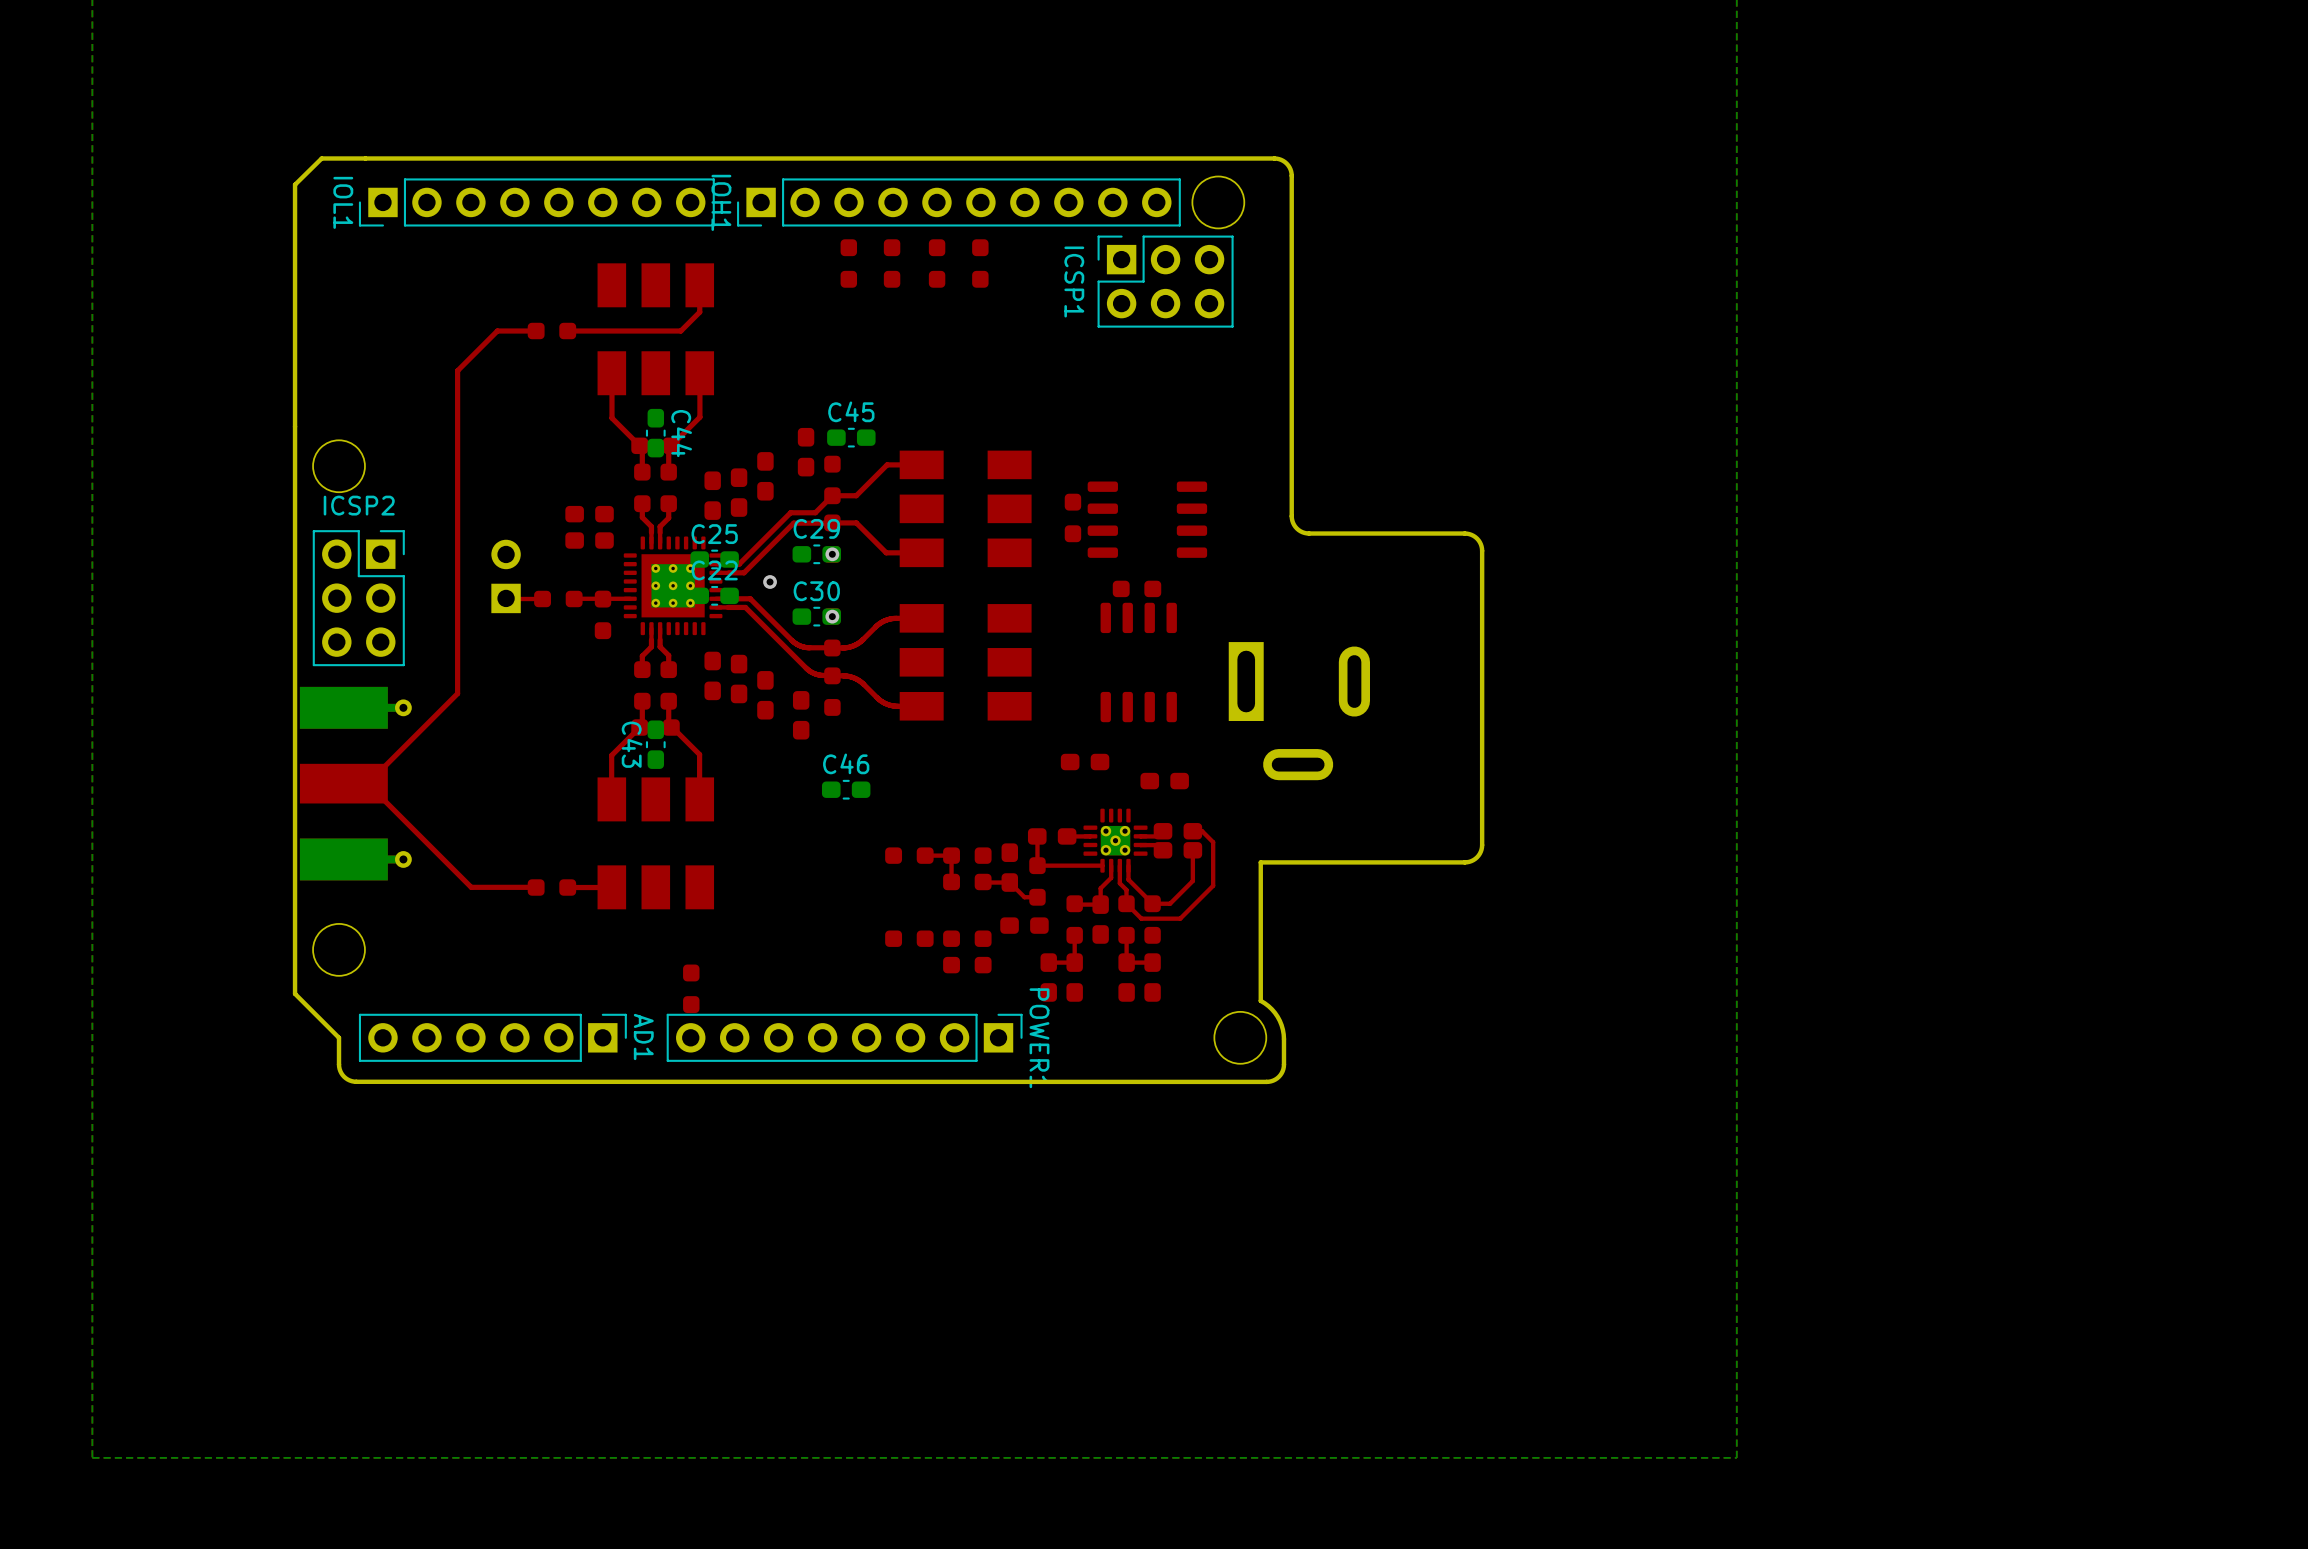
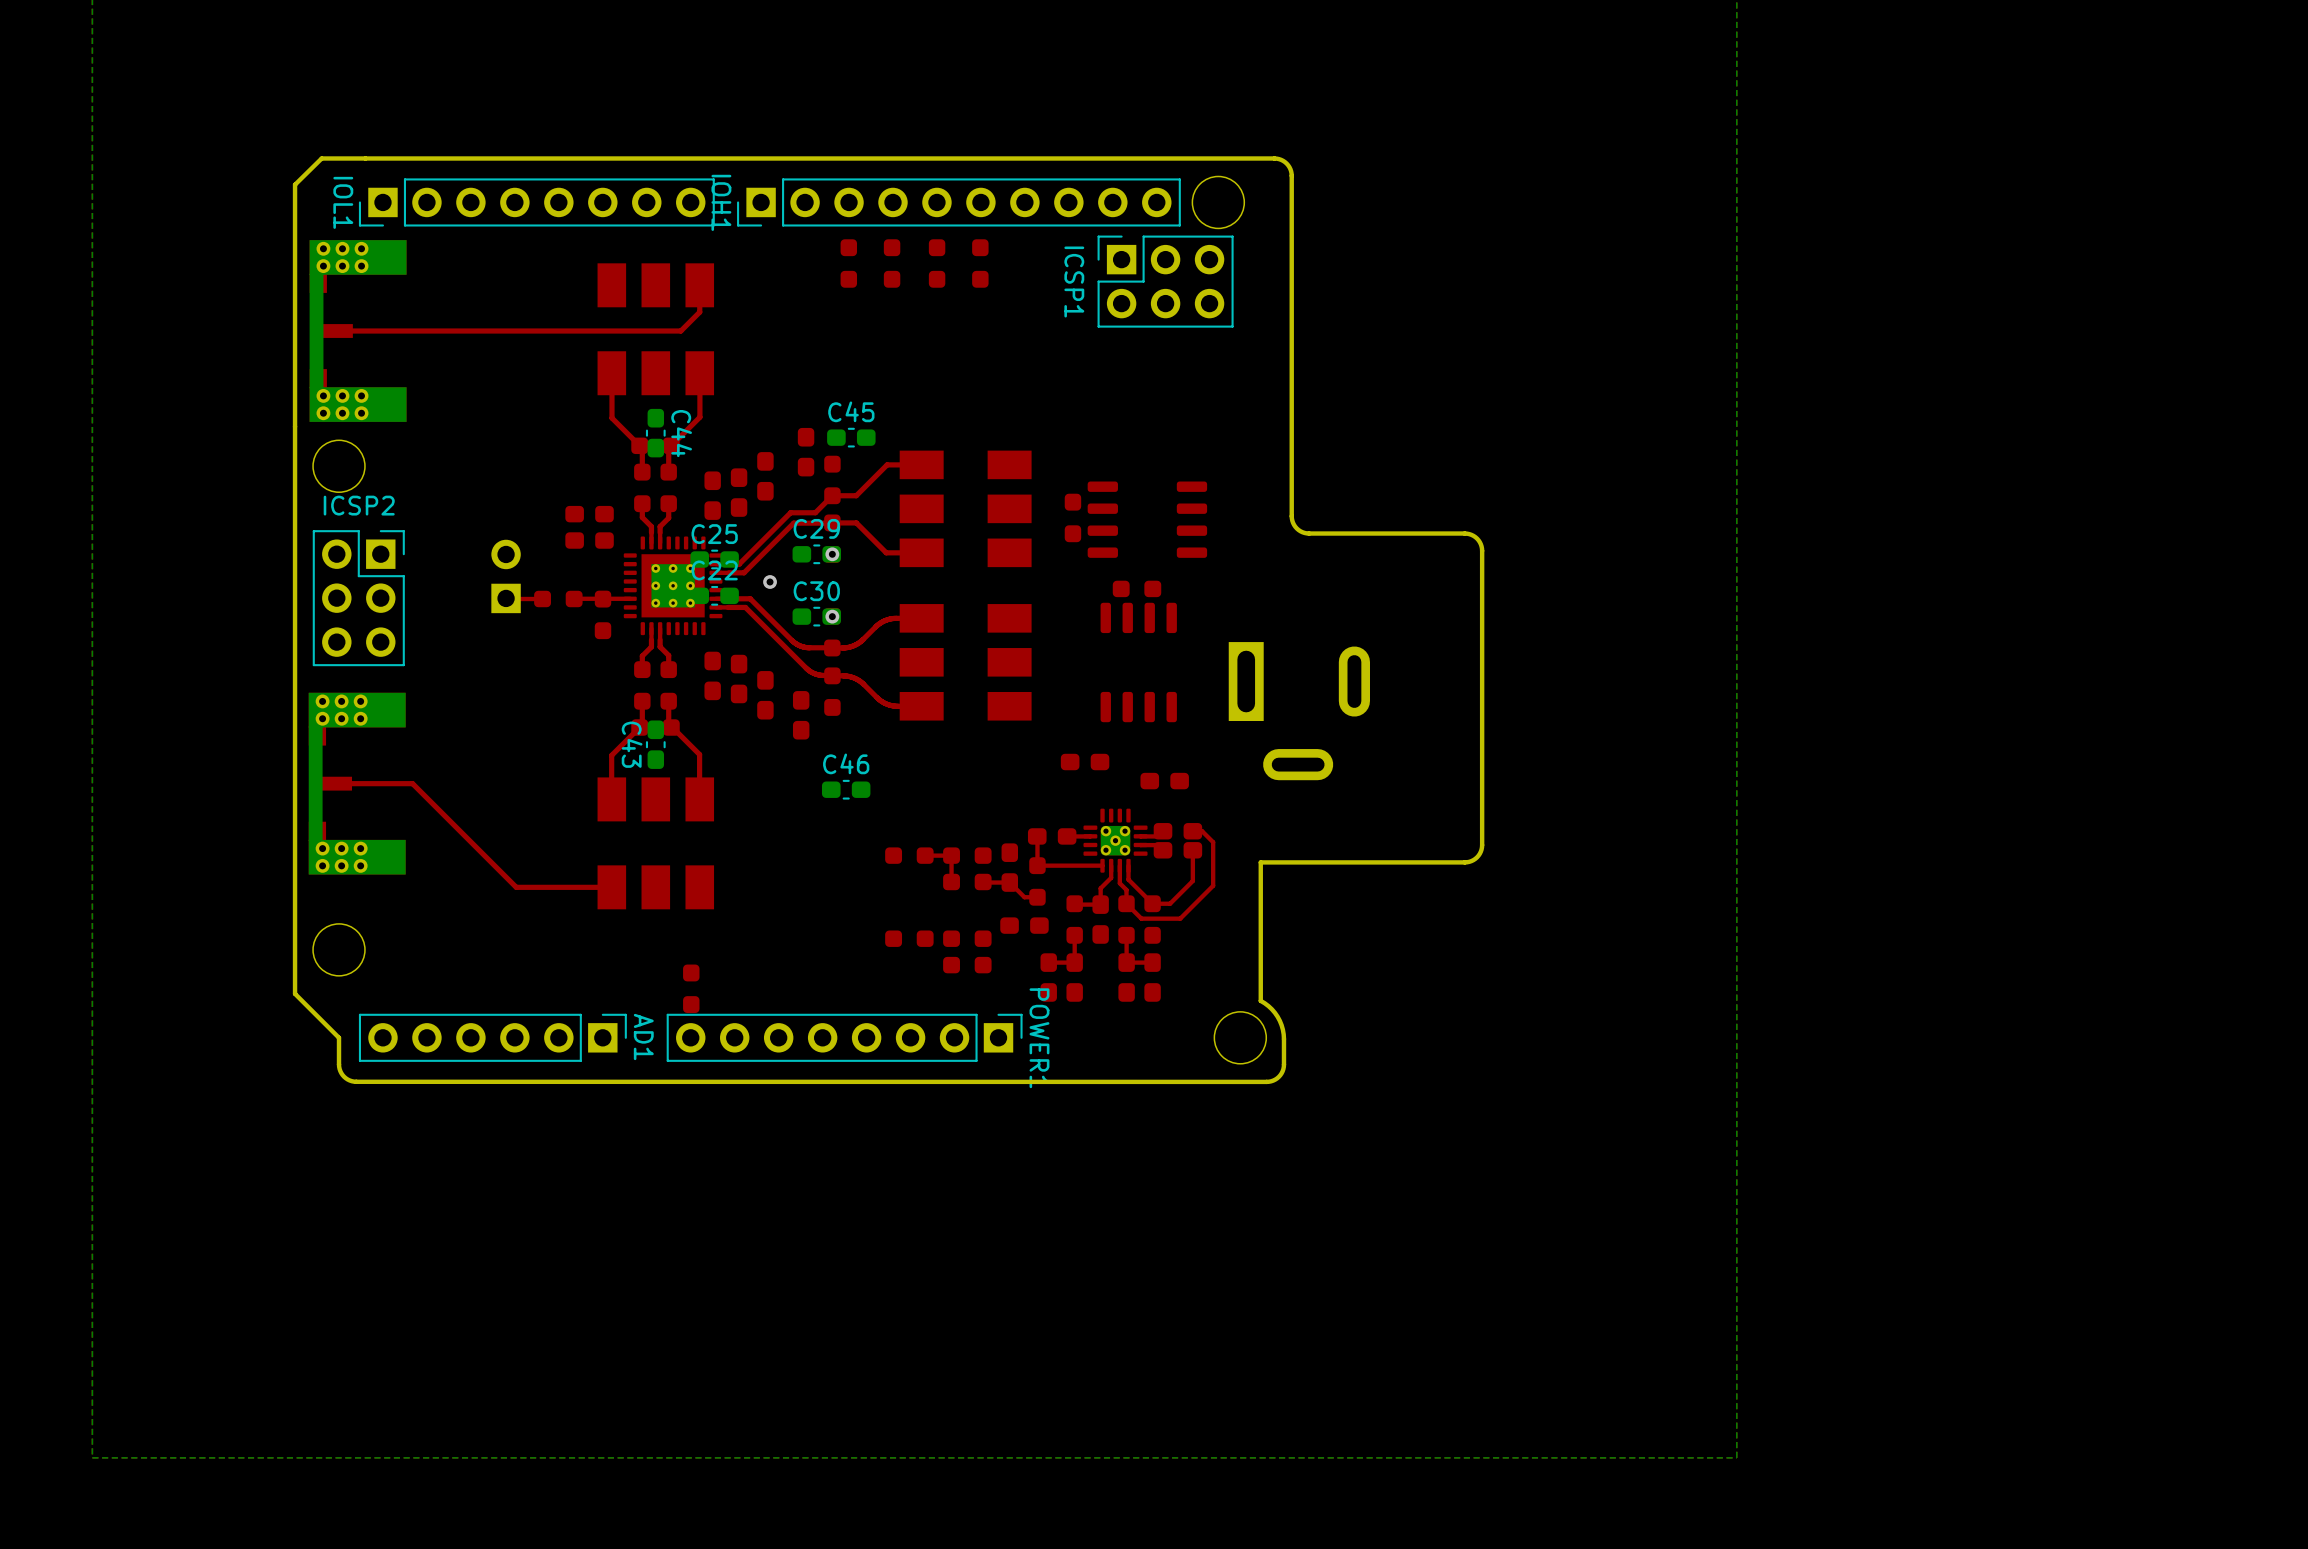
part: none -> (358, 331)
top track: (497, 331) (457, 370) (457, 693) (367, 783) (471, 887) (516, 887) -> (367, 783) (412, 783) (516, 887)
top track: none -> (497, 331) (332, 331)
part: (551, 331) -> none
top track: none -> (567, 331) (536, 331)
part footprint: [299, 686, 412, 881] -> [308, 692, 406, 875]
part: (551, 887) -> none
top track: (611, 887) (567, 887) -> (611, 887) (535, 887)

